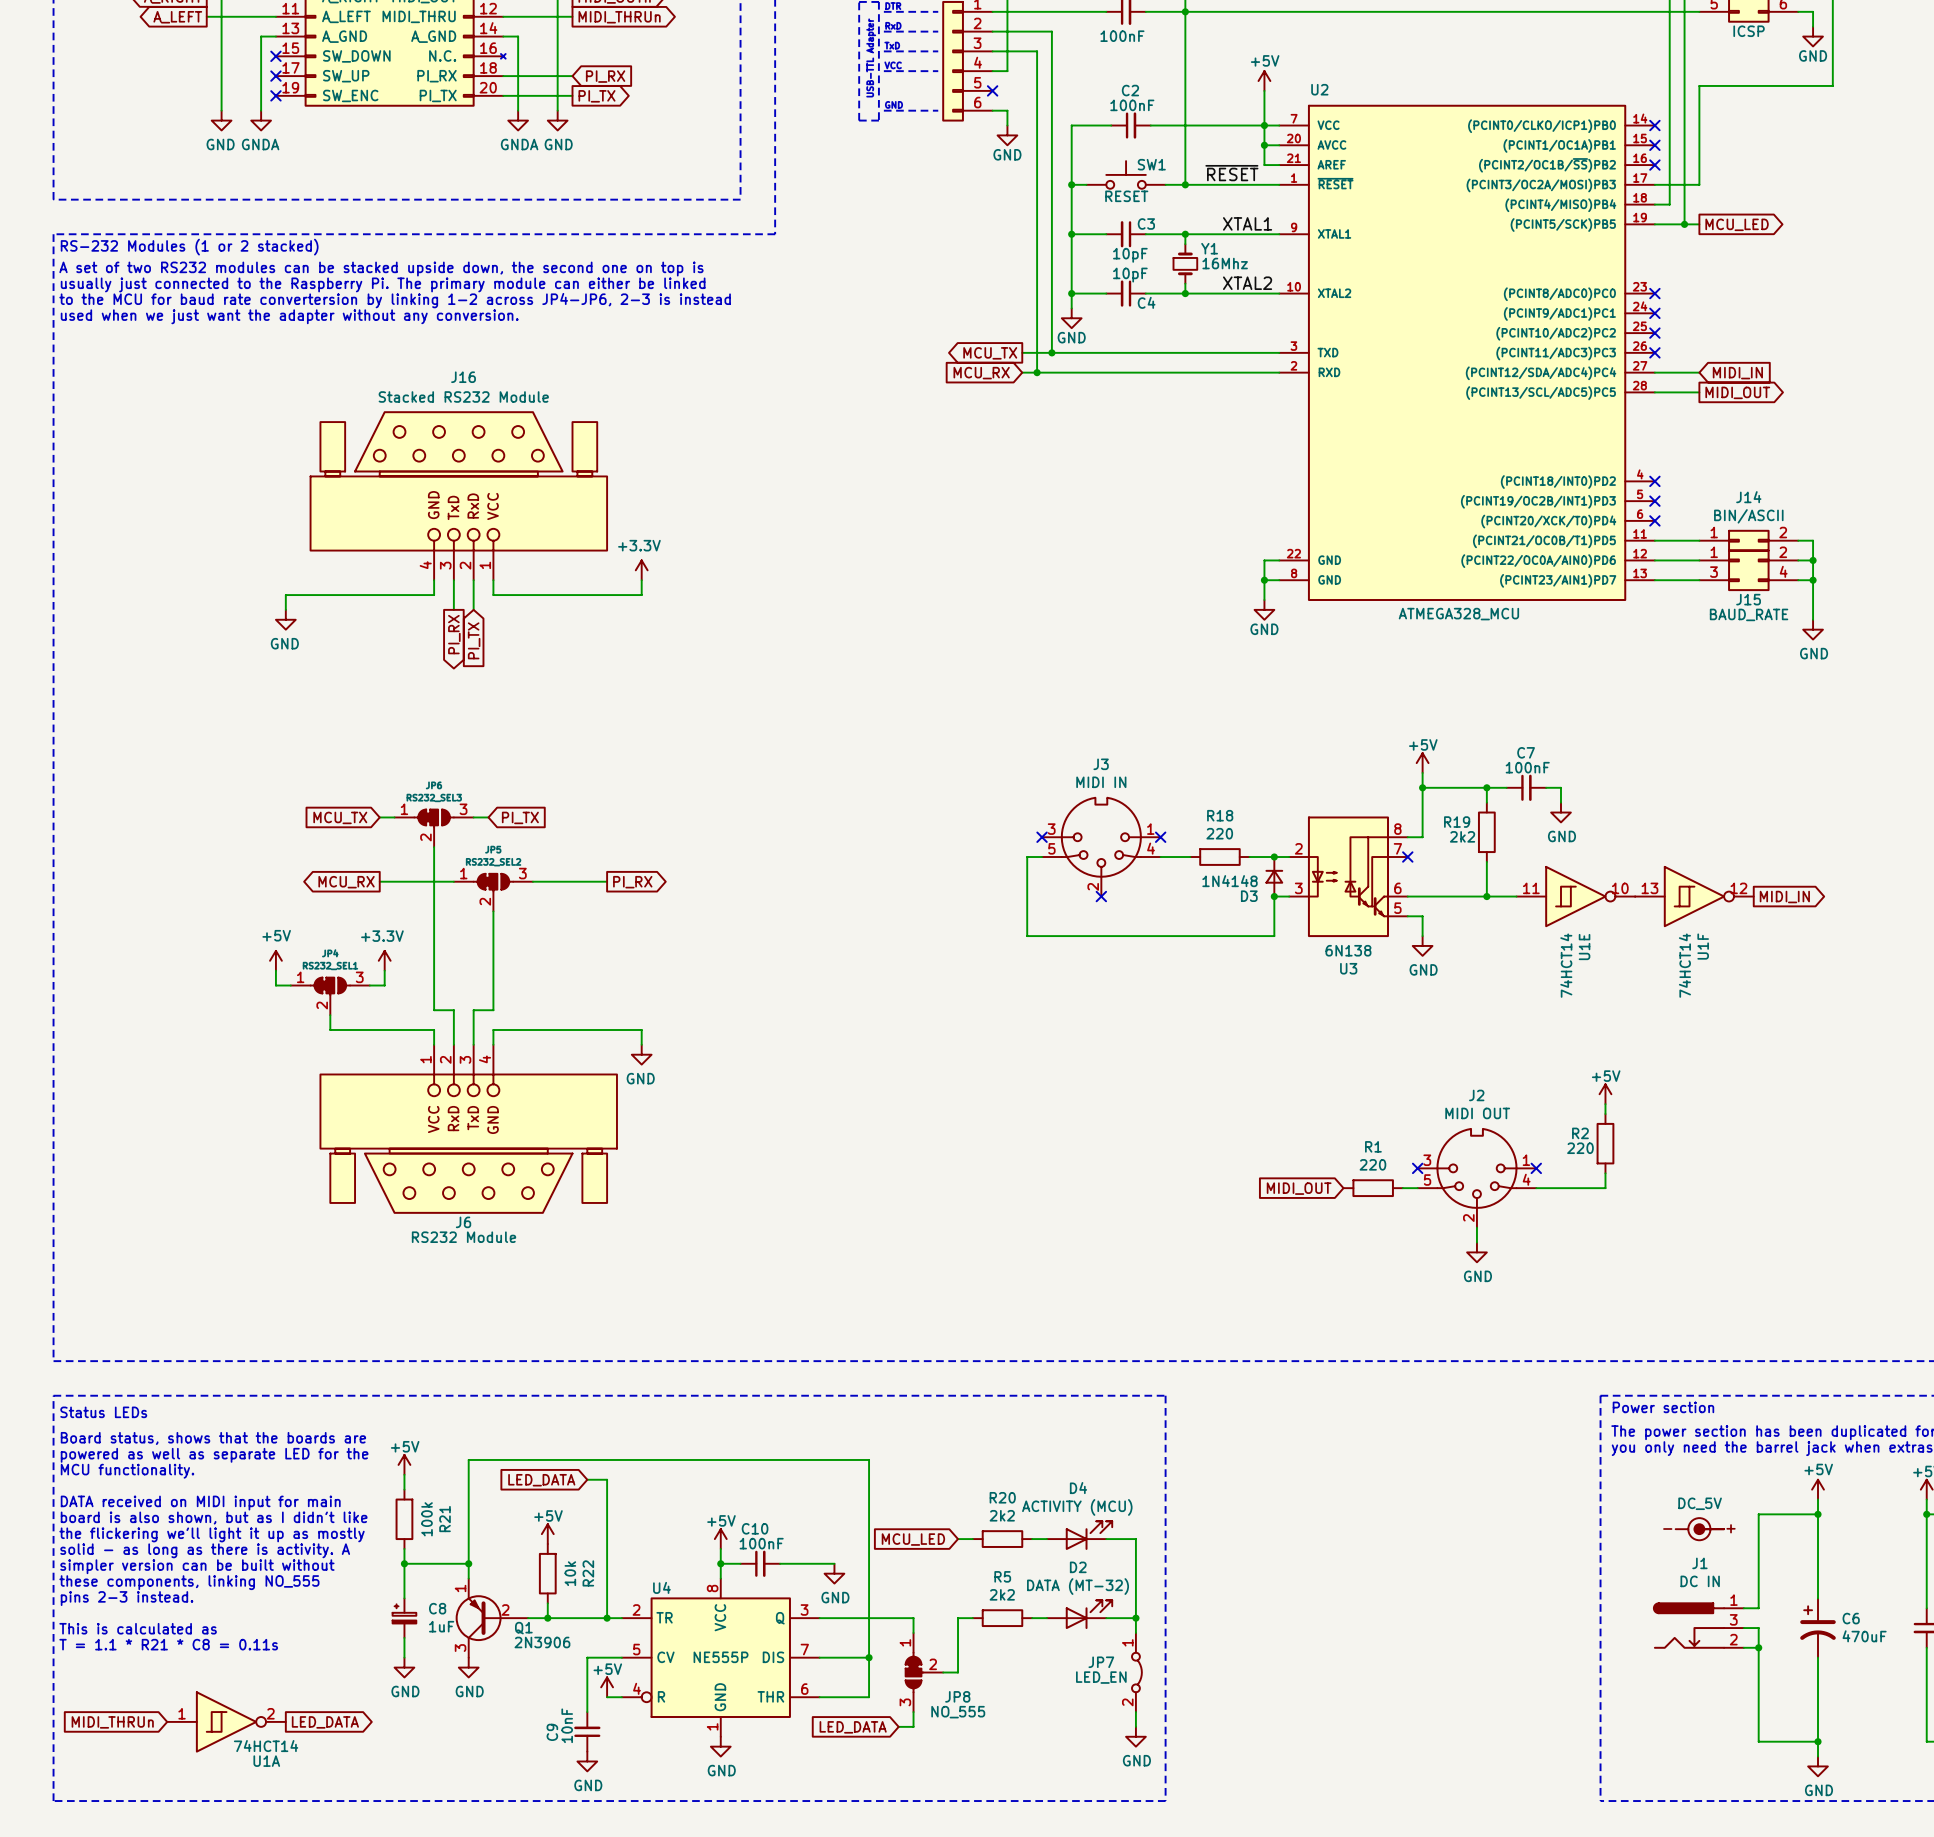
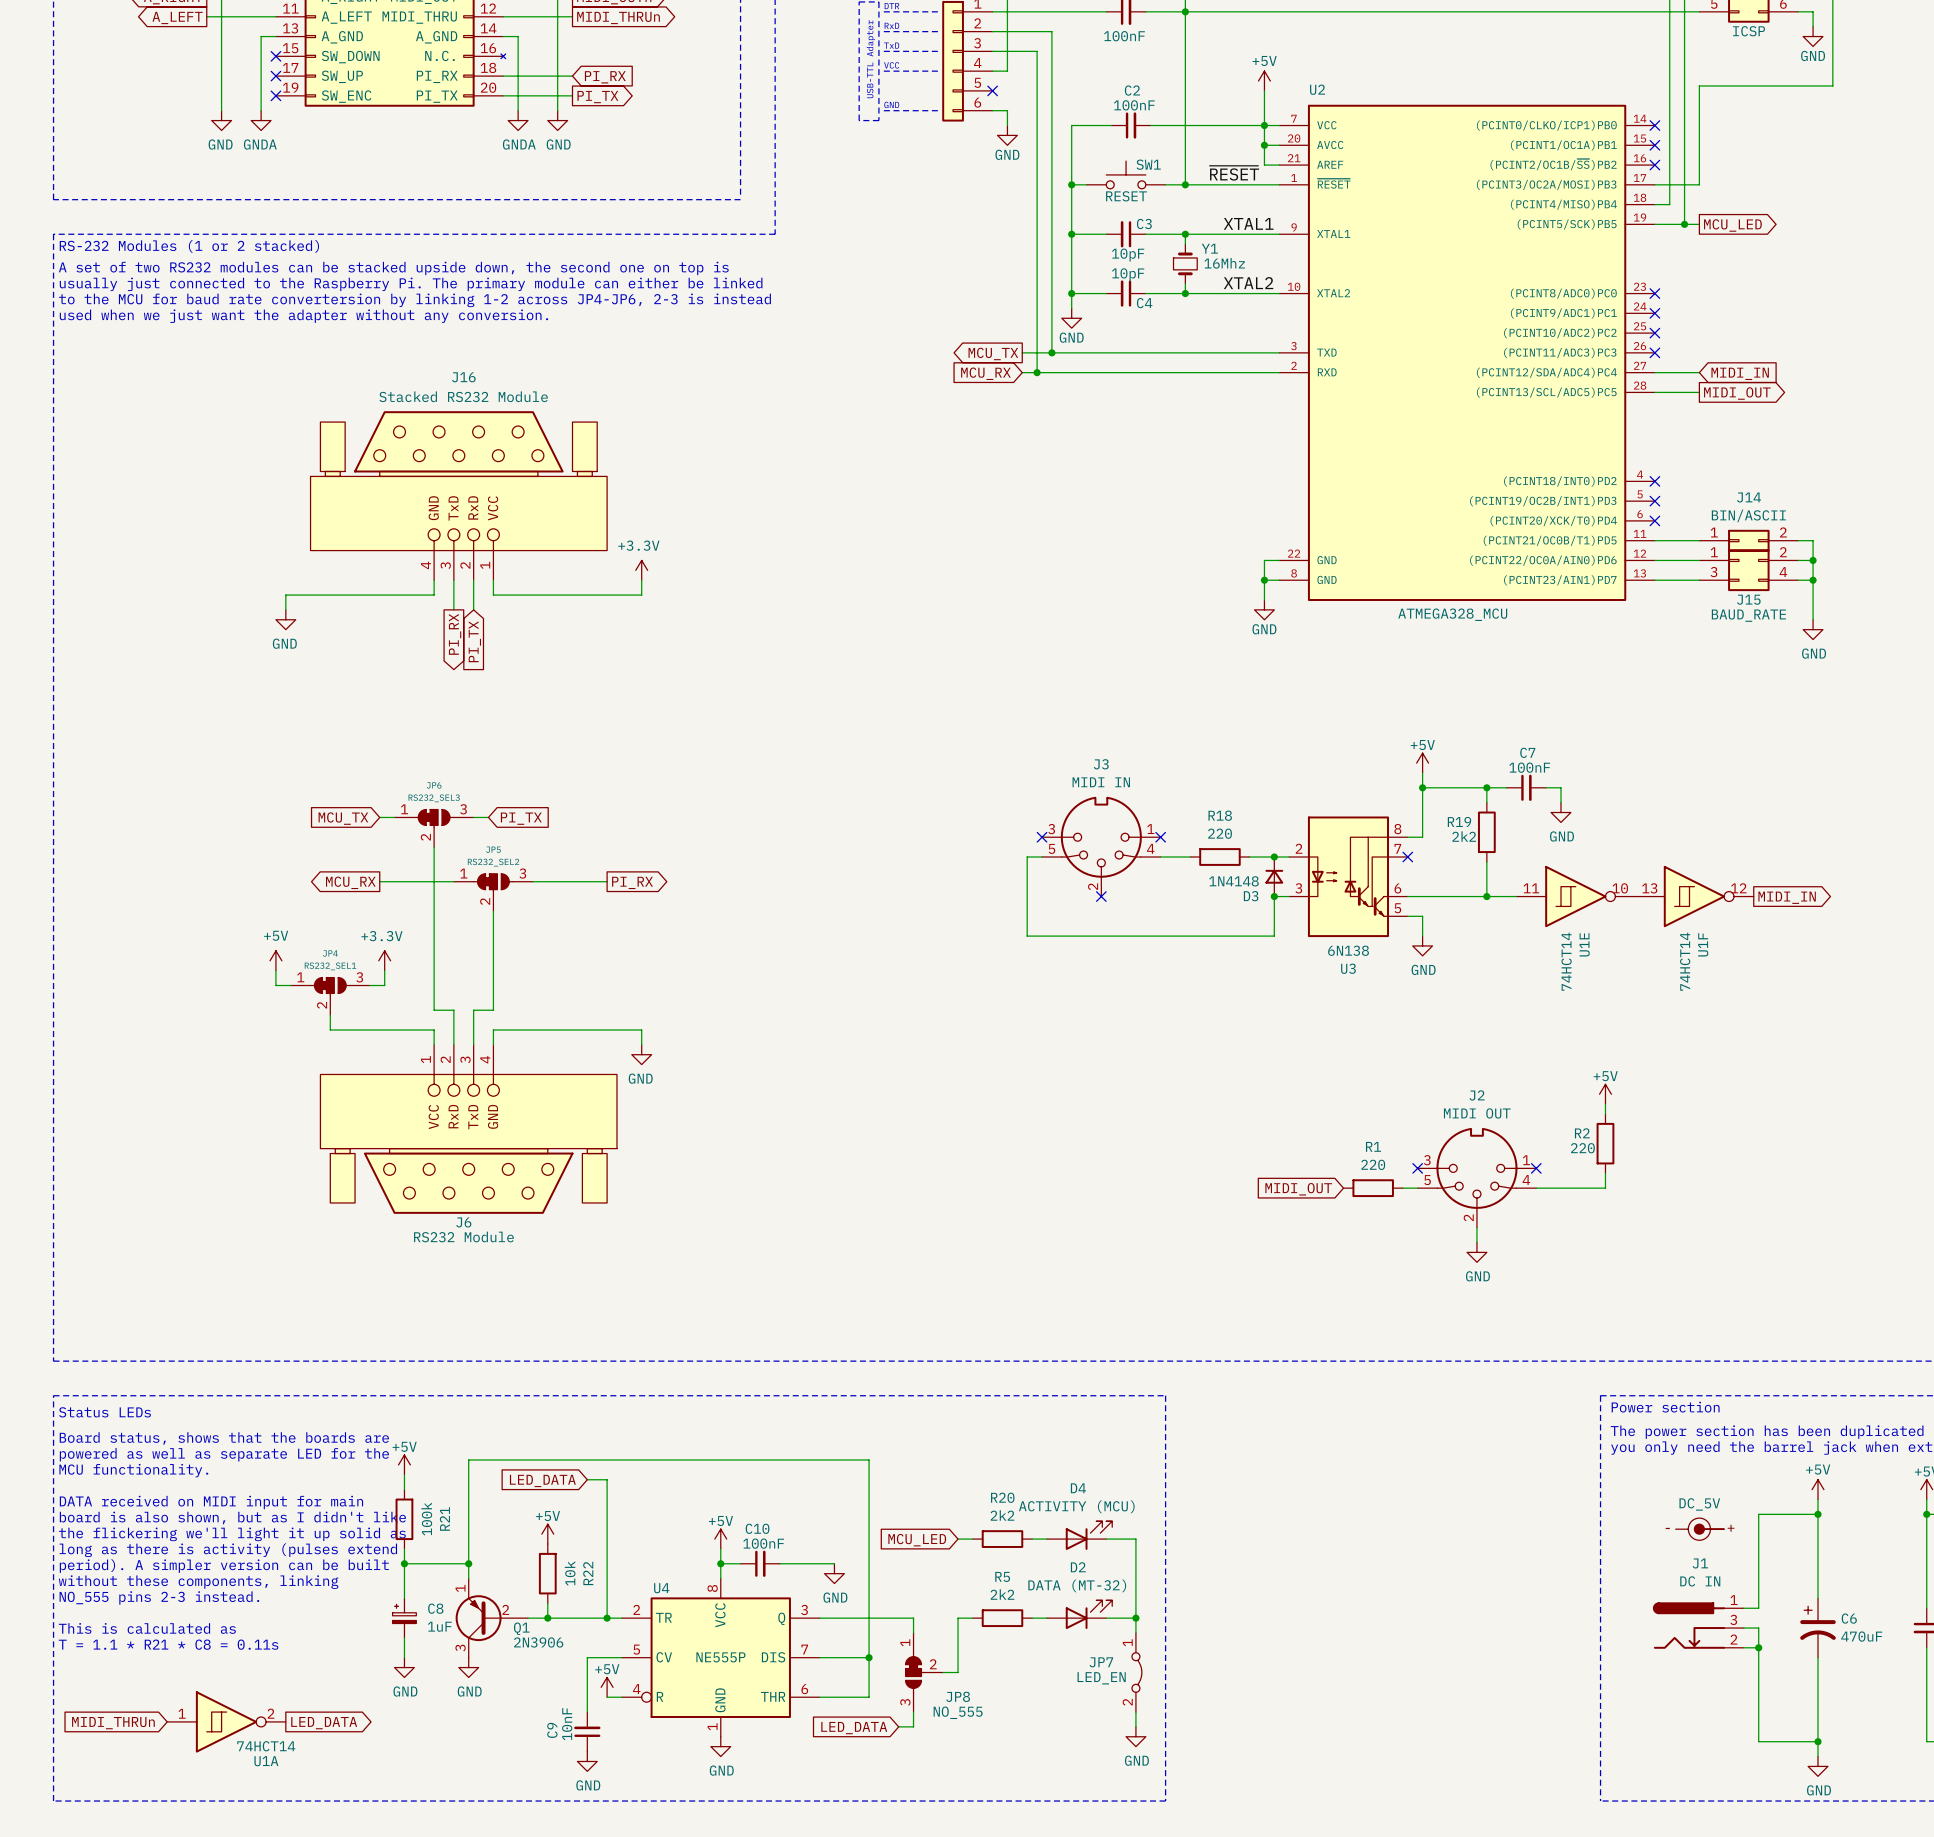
text: the flickering we'll light it up as mostly (212, 1534) -> the flickering we'll light it up solid as (232, 1534)
text: solid - as long as there is activity. A (205, 1550) -> long as there is activity (pulses extend (228, 1550)
text: simpler version can be built without (197, 1566) -> period). A simpler version can be built (224, 1566)
text: these components, linking NO_555 (189, 1582) -> without these components, linking (198, 1582)
text: pins 2-3 instead. (127, 1598) -> NO_555 pins 2-3 instead. (159, 1597)

